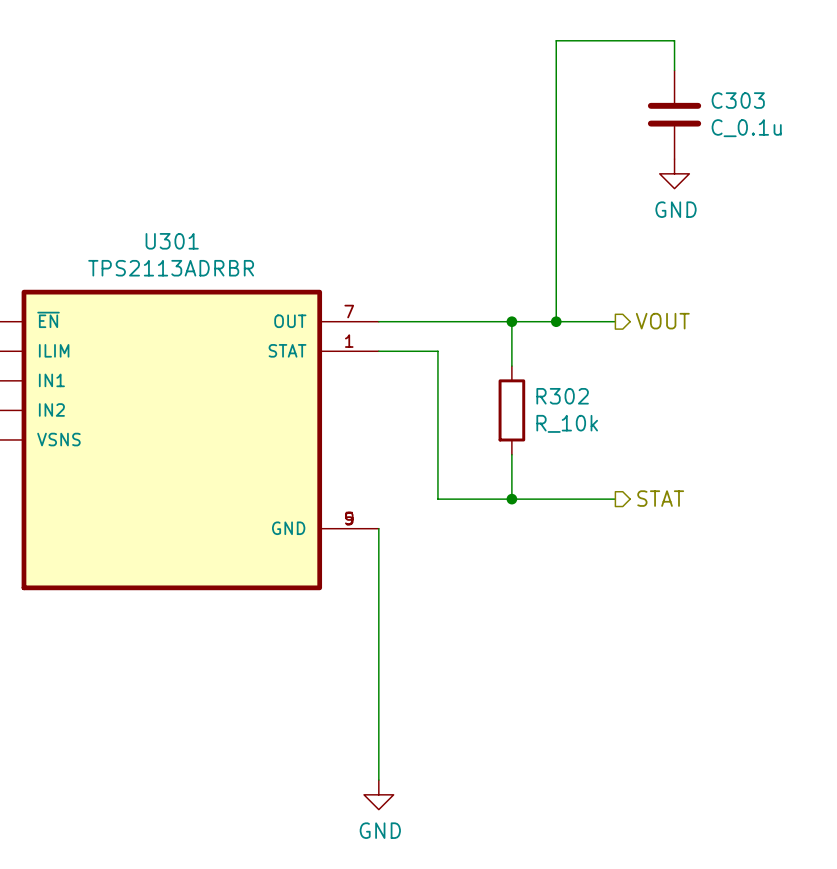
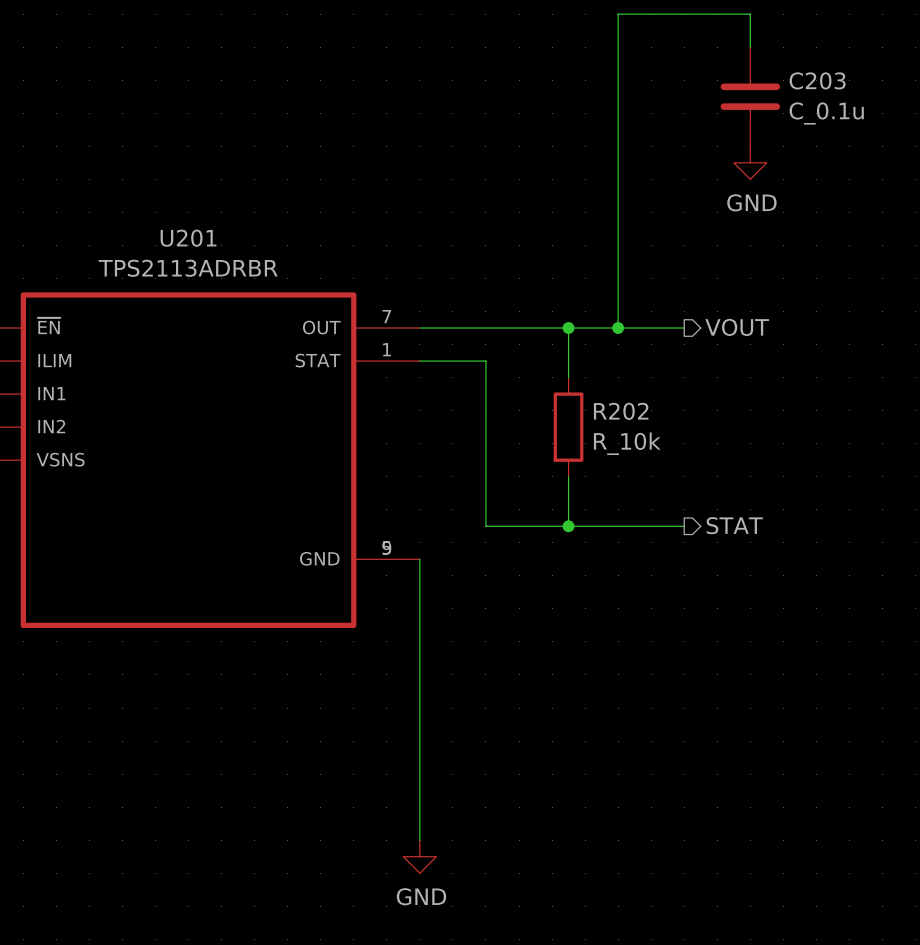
C303 name: C303 (738, 100) -> C203 (817, 80)
U301 name: U301 (172, 241) -> U201 (188, 238)
R302 name: R302 (562, 396) -> R202 (621, 411)

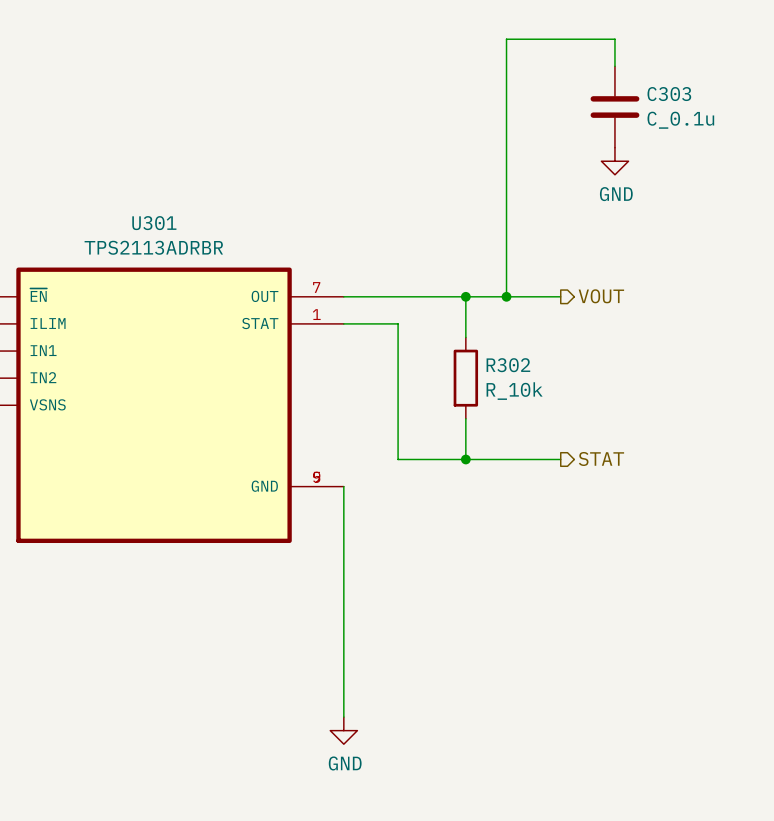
C203 name: C203 (817, 80) -> C303 (669, 94)
U201 name: U201 (188, 238) -> U301 (154, 223)
R202 name: R202 (621, 411) -> R302 (508, 365)

